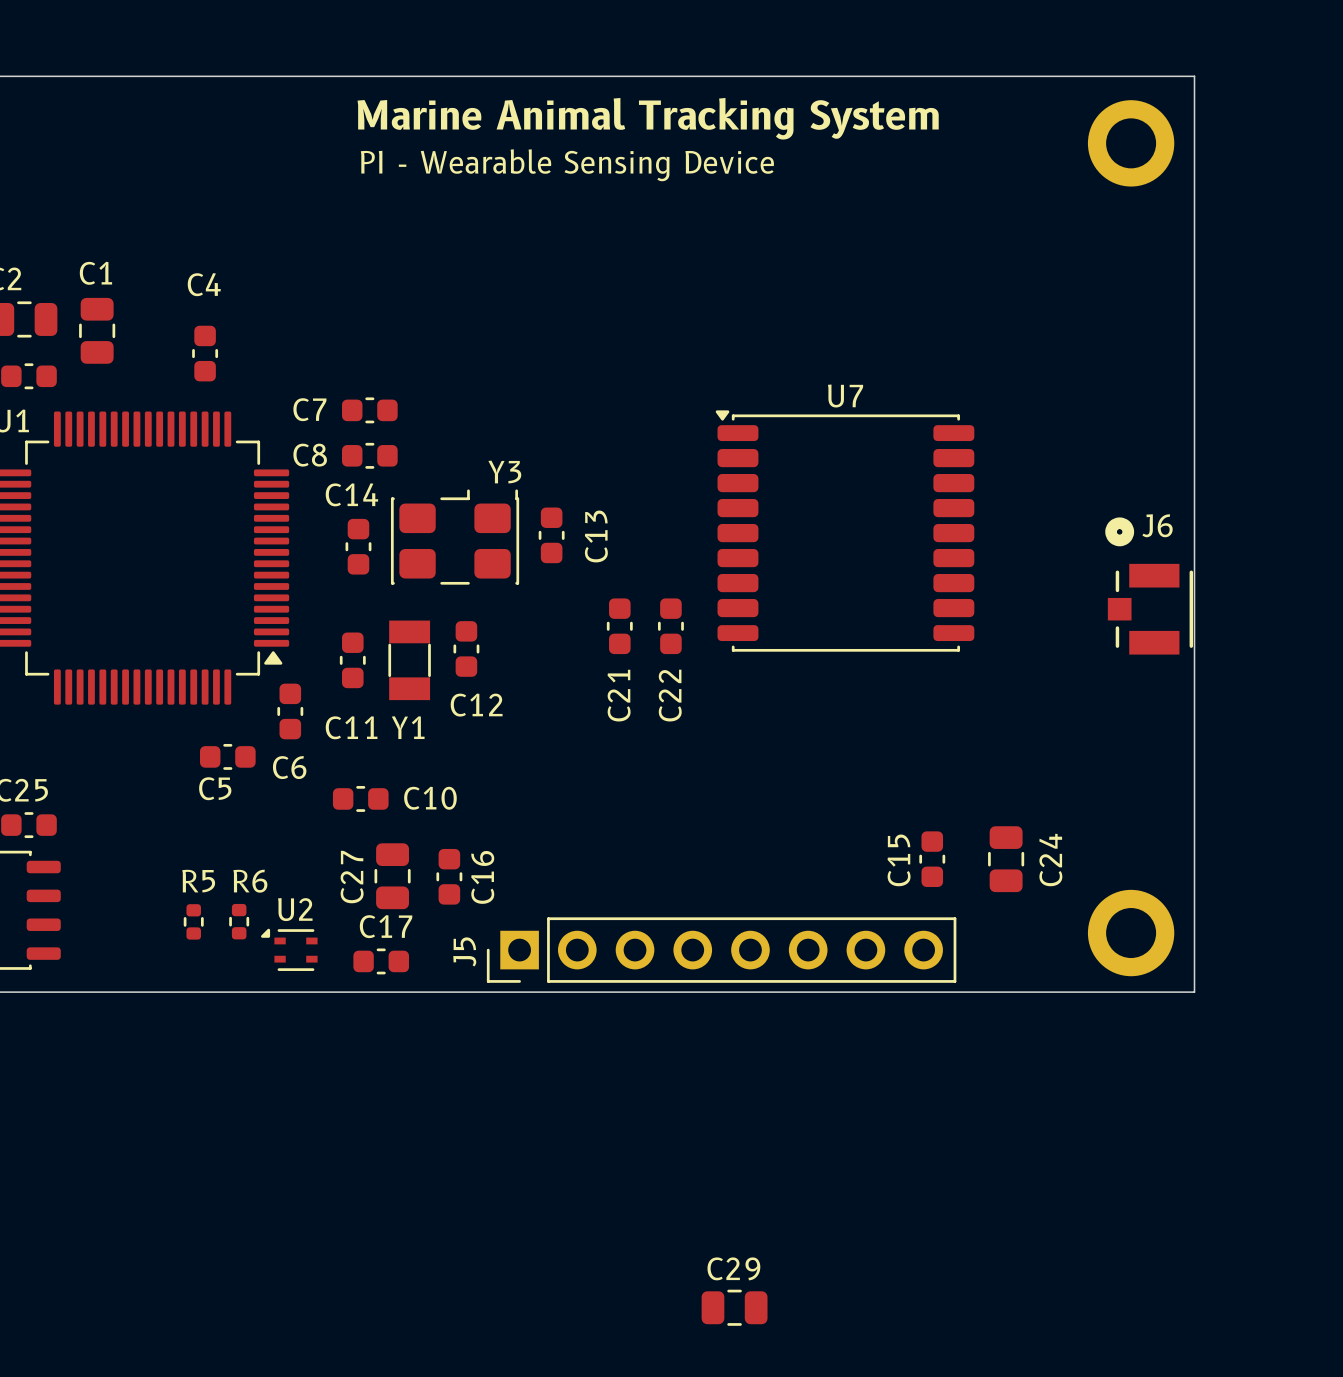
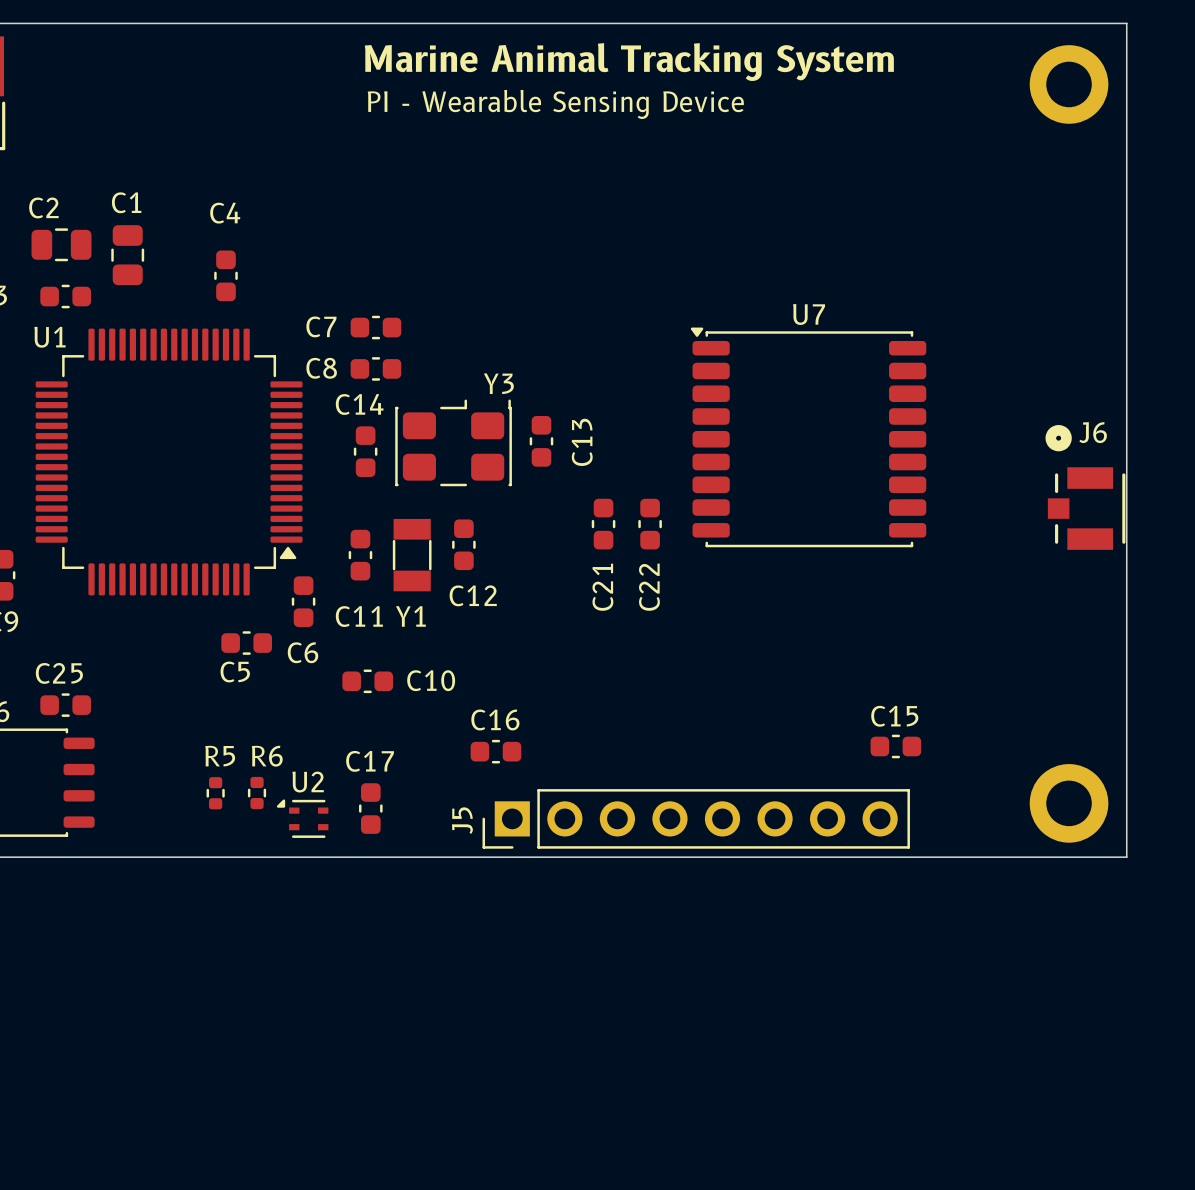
C15 rotation: 0° (932, 859) -> 90° clockwise (895, 746)
C24: (1006, 859) -> none
C27: (392, 876) -> none
C16 rotation: 0° (449, 876) -> 90° clockwise (495, 751)
C16 position: (449, 876) -> (495, 751)
C16 name position: C16 (482, 877) -> C16 (495, 719)
C17 rotation: 0° (381, 961) -> 90° clockwise (370, 808)
C29: (734, 1307) -> none

